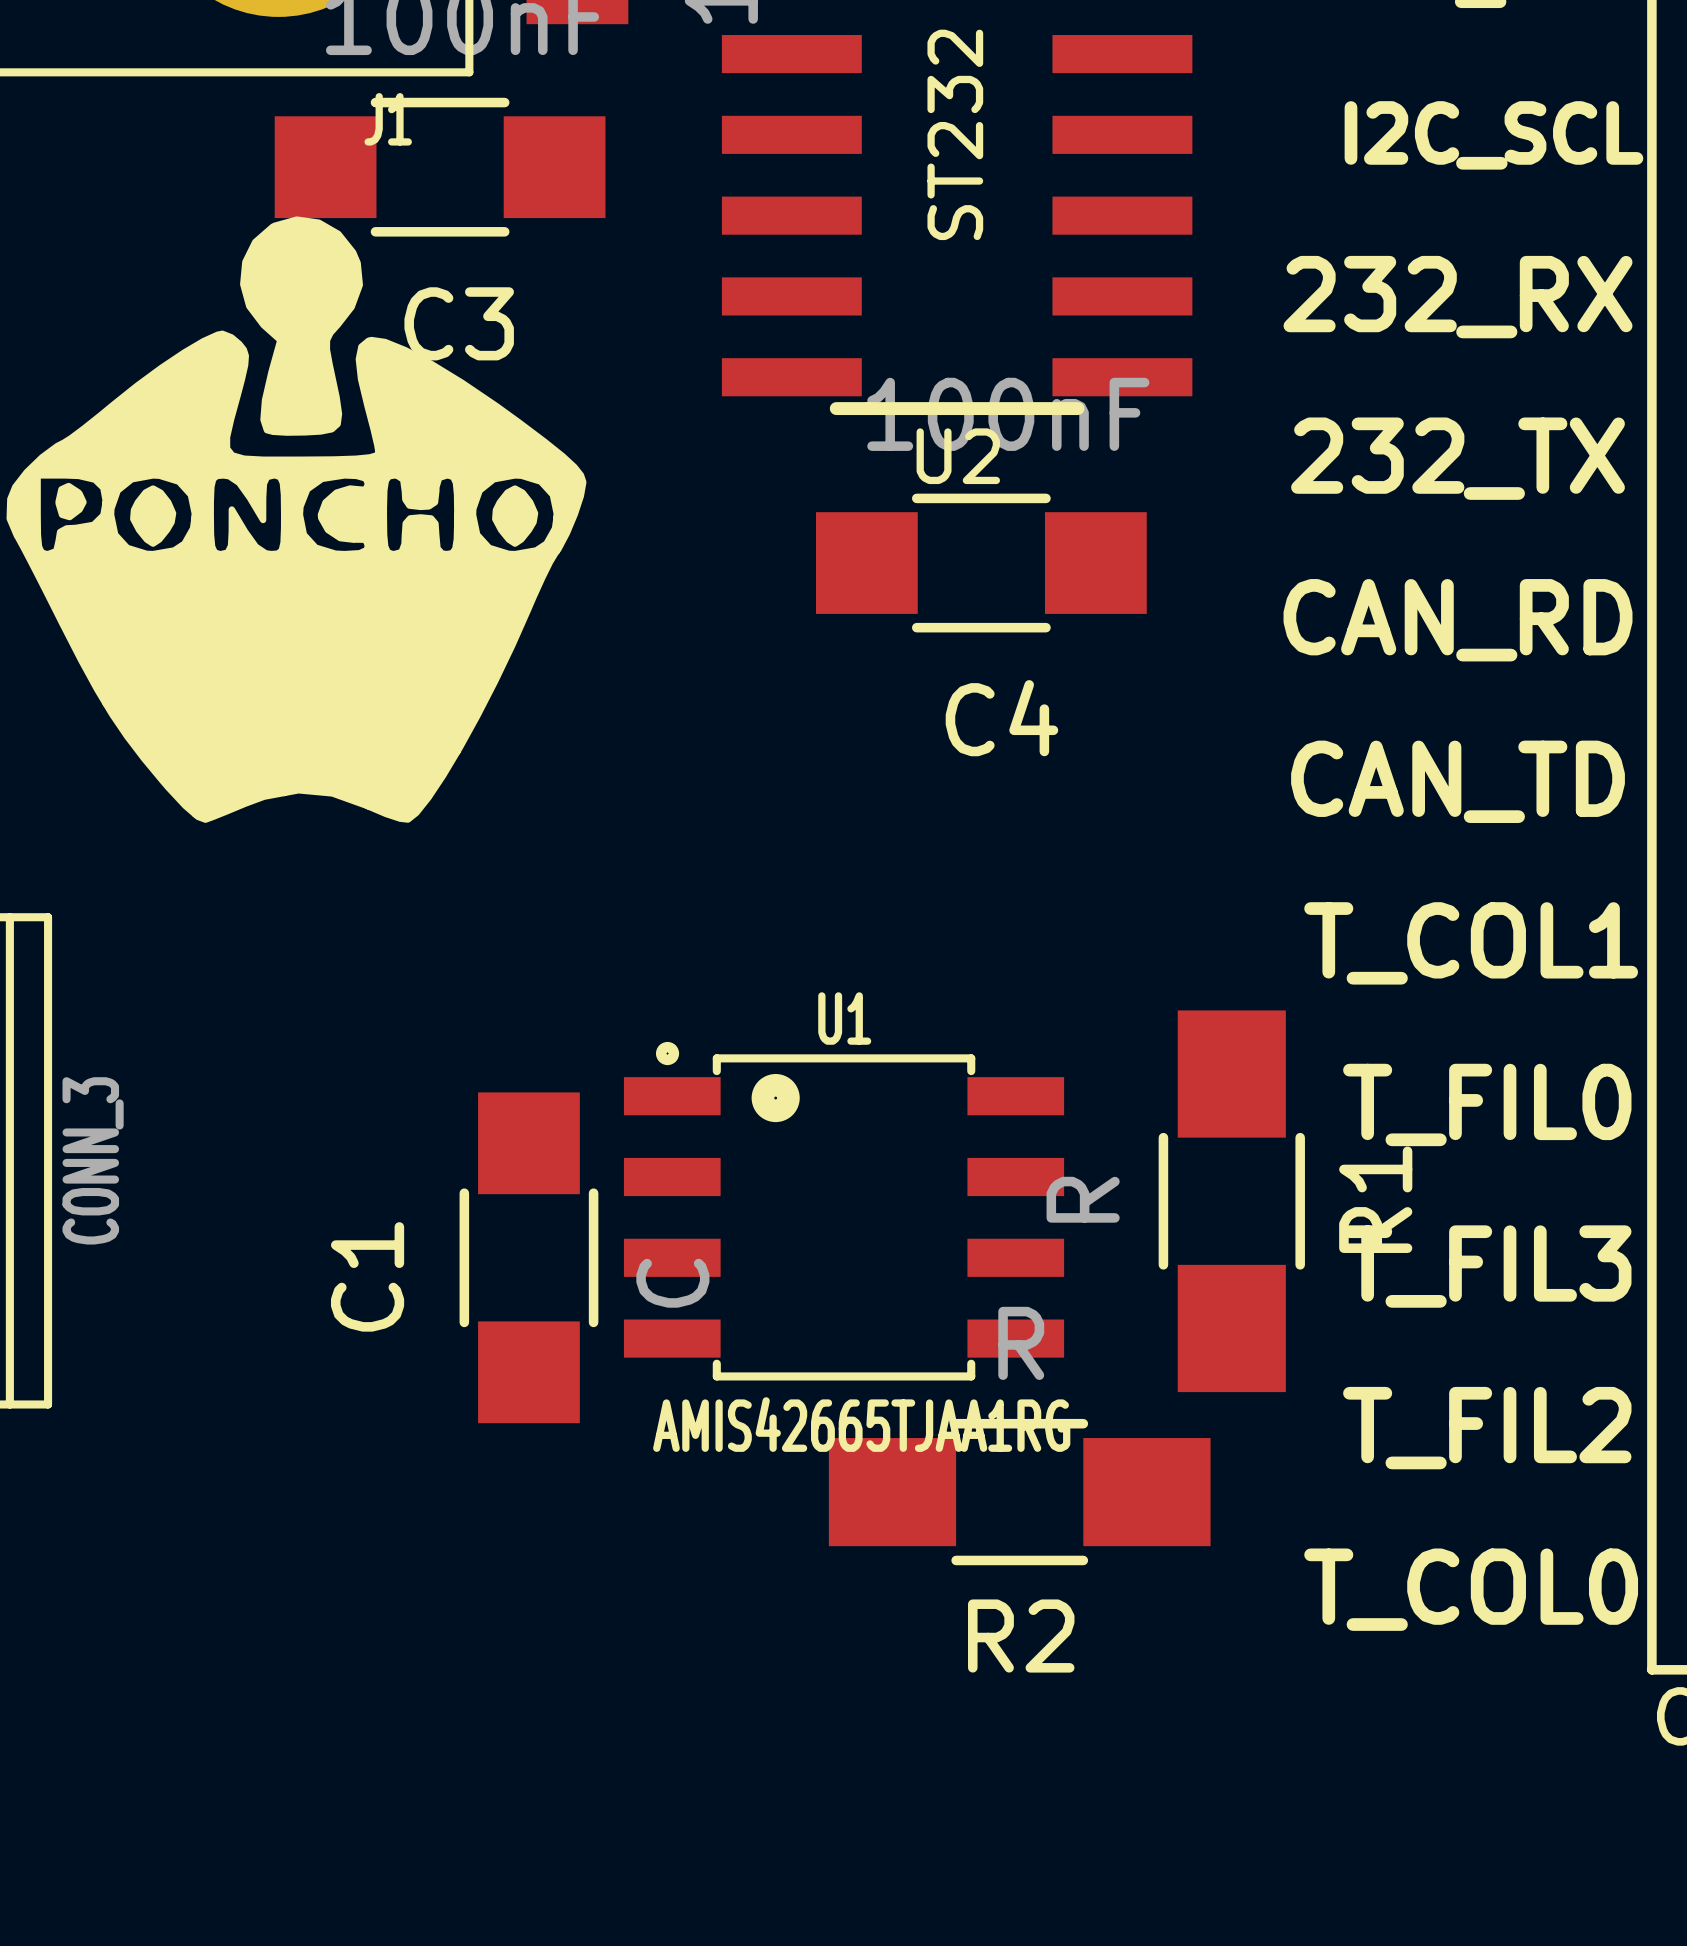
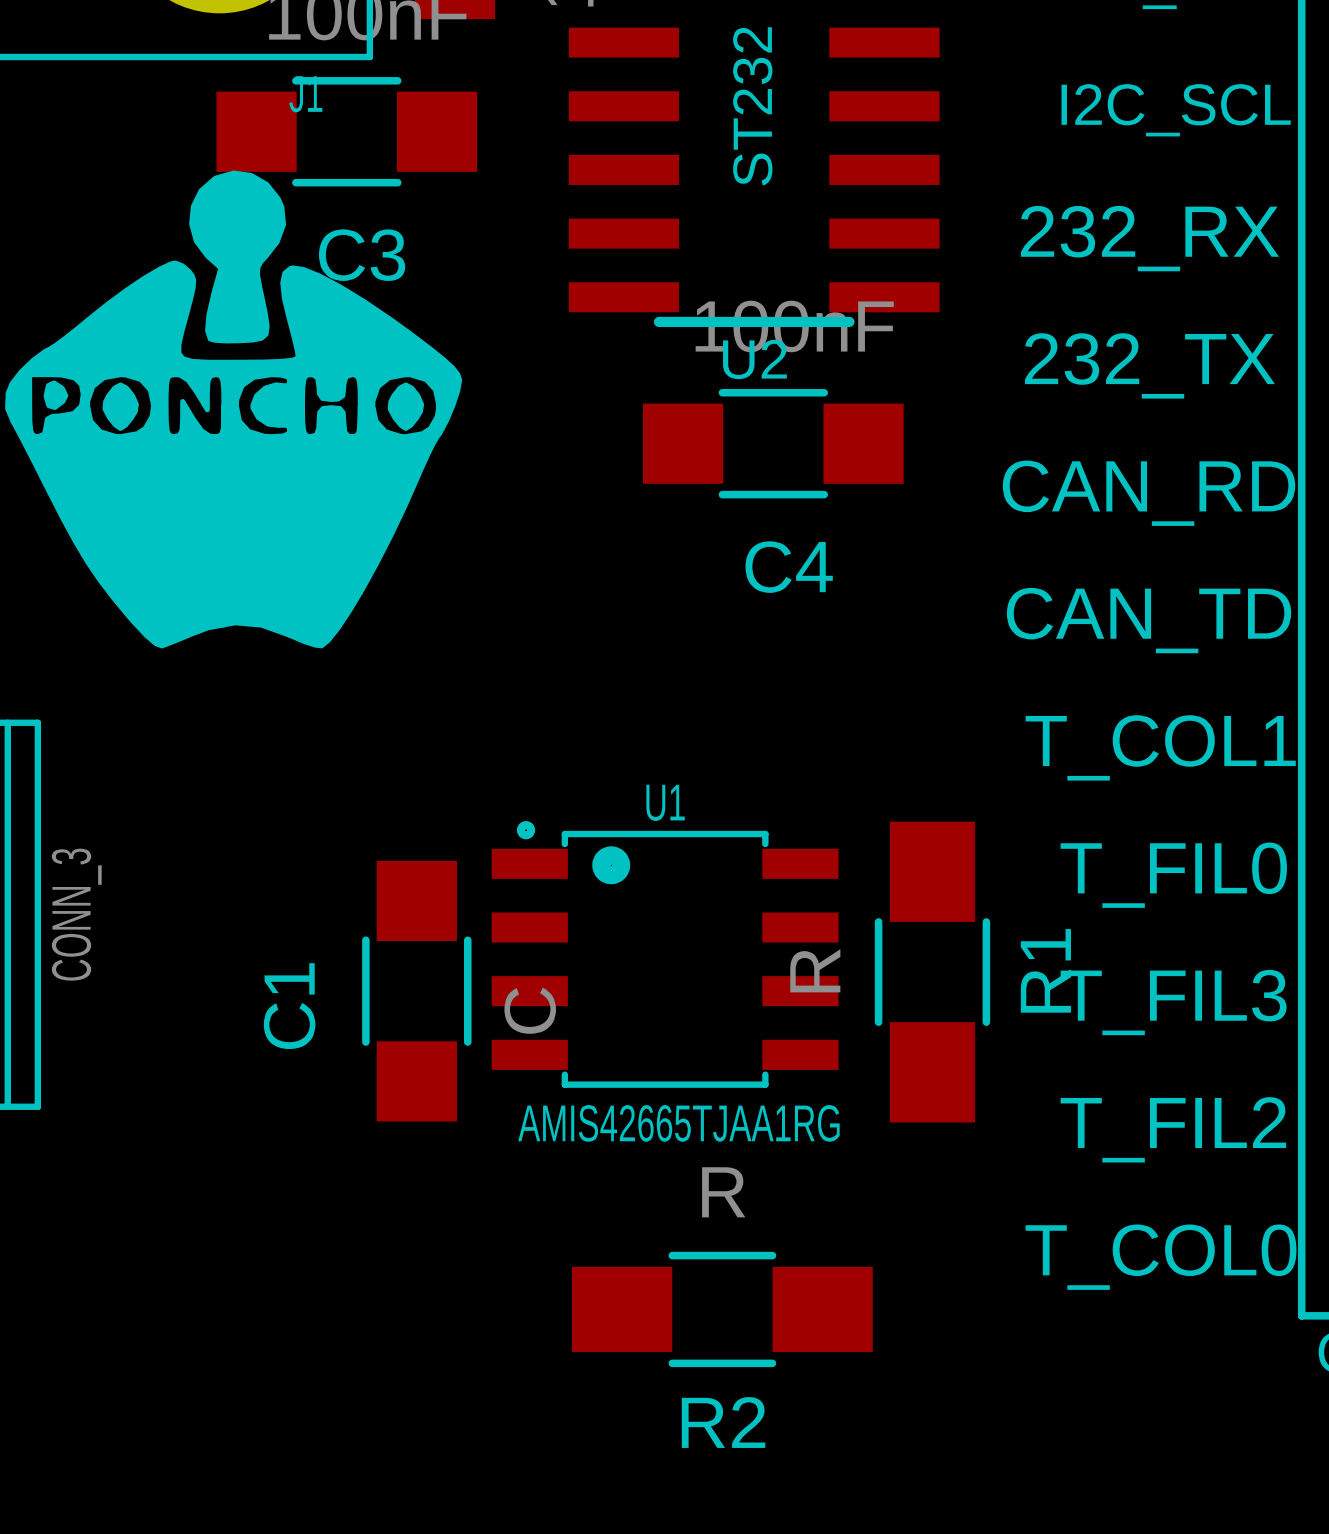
R1 position: (1231, 1201) -> (932, 972)
R2 position: (1019, 1492) -> (722, 1309)

